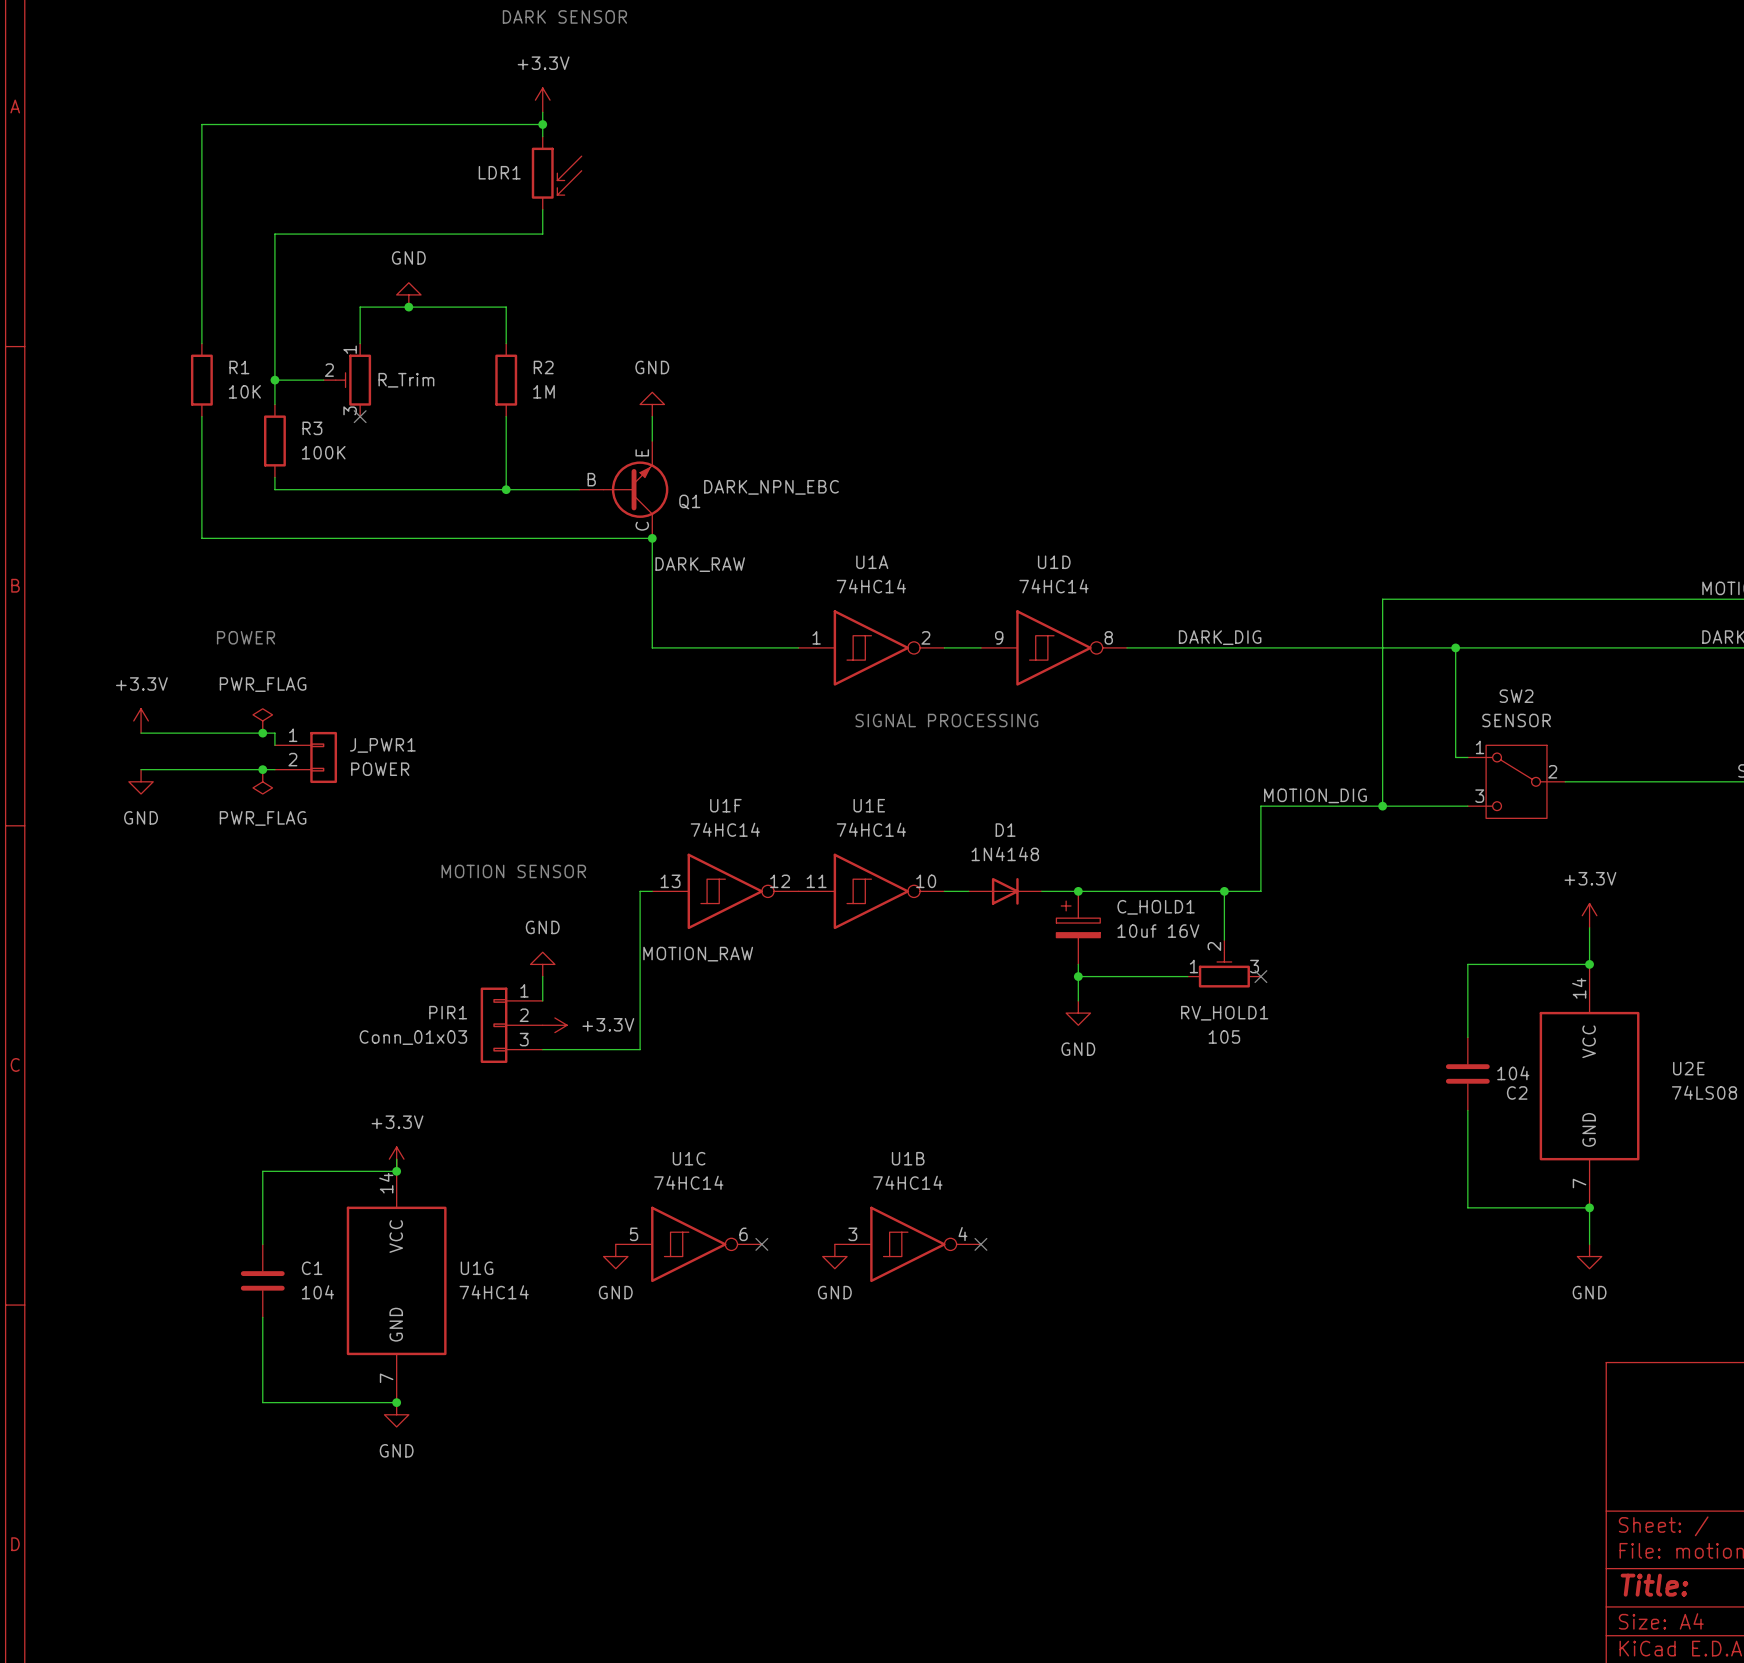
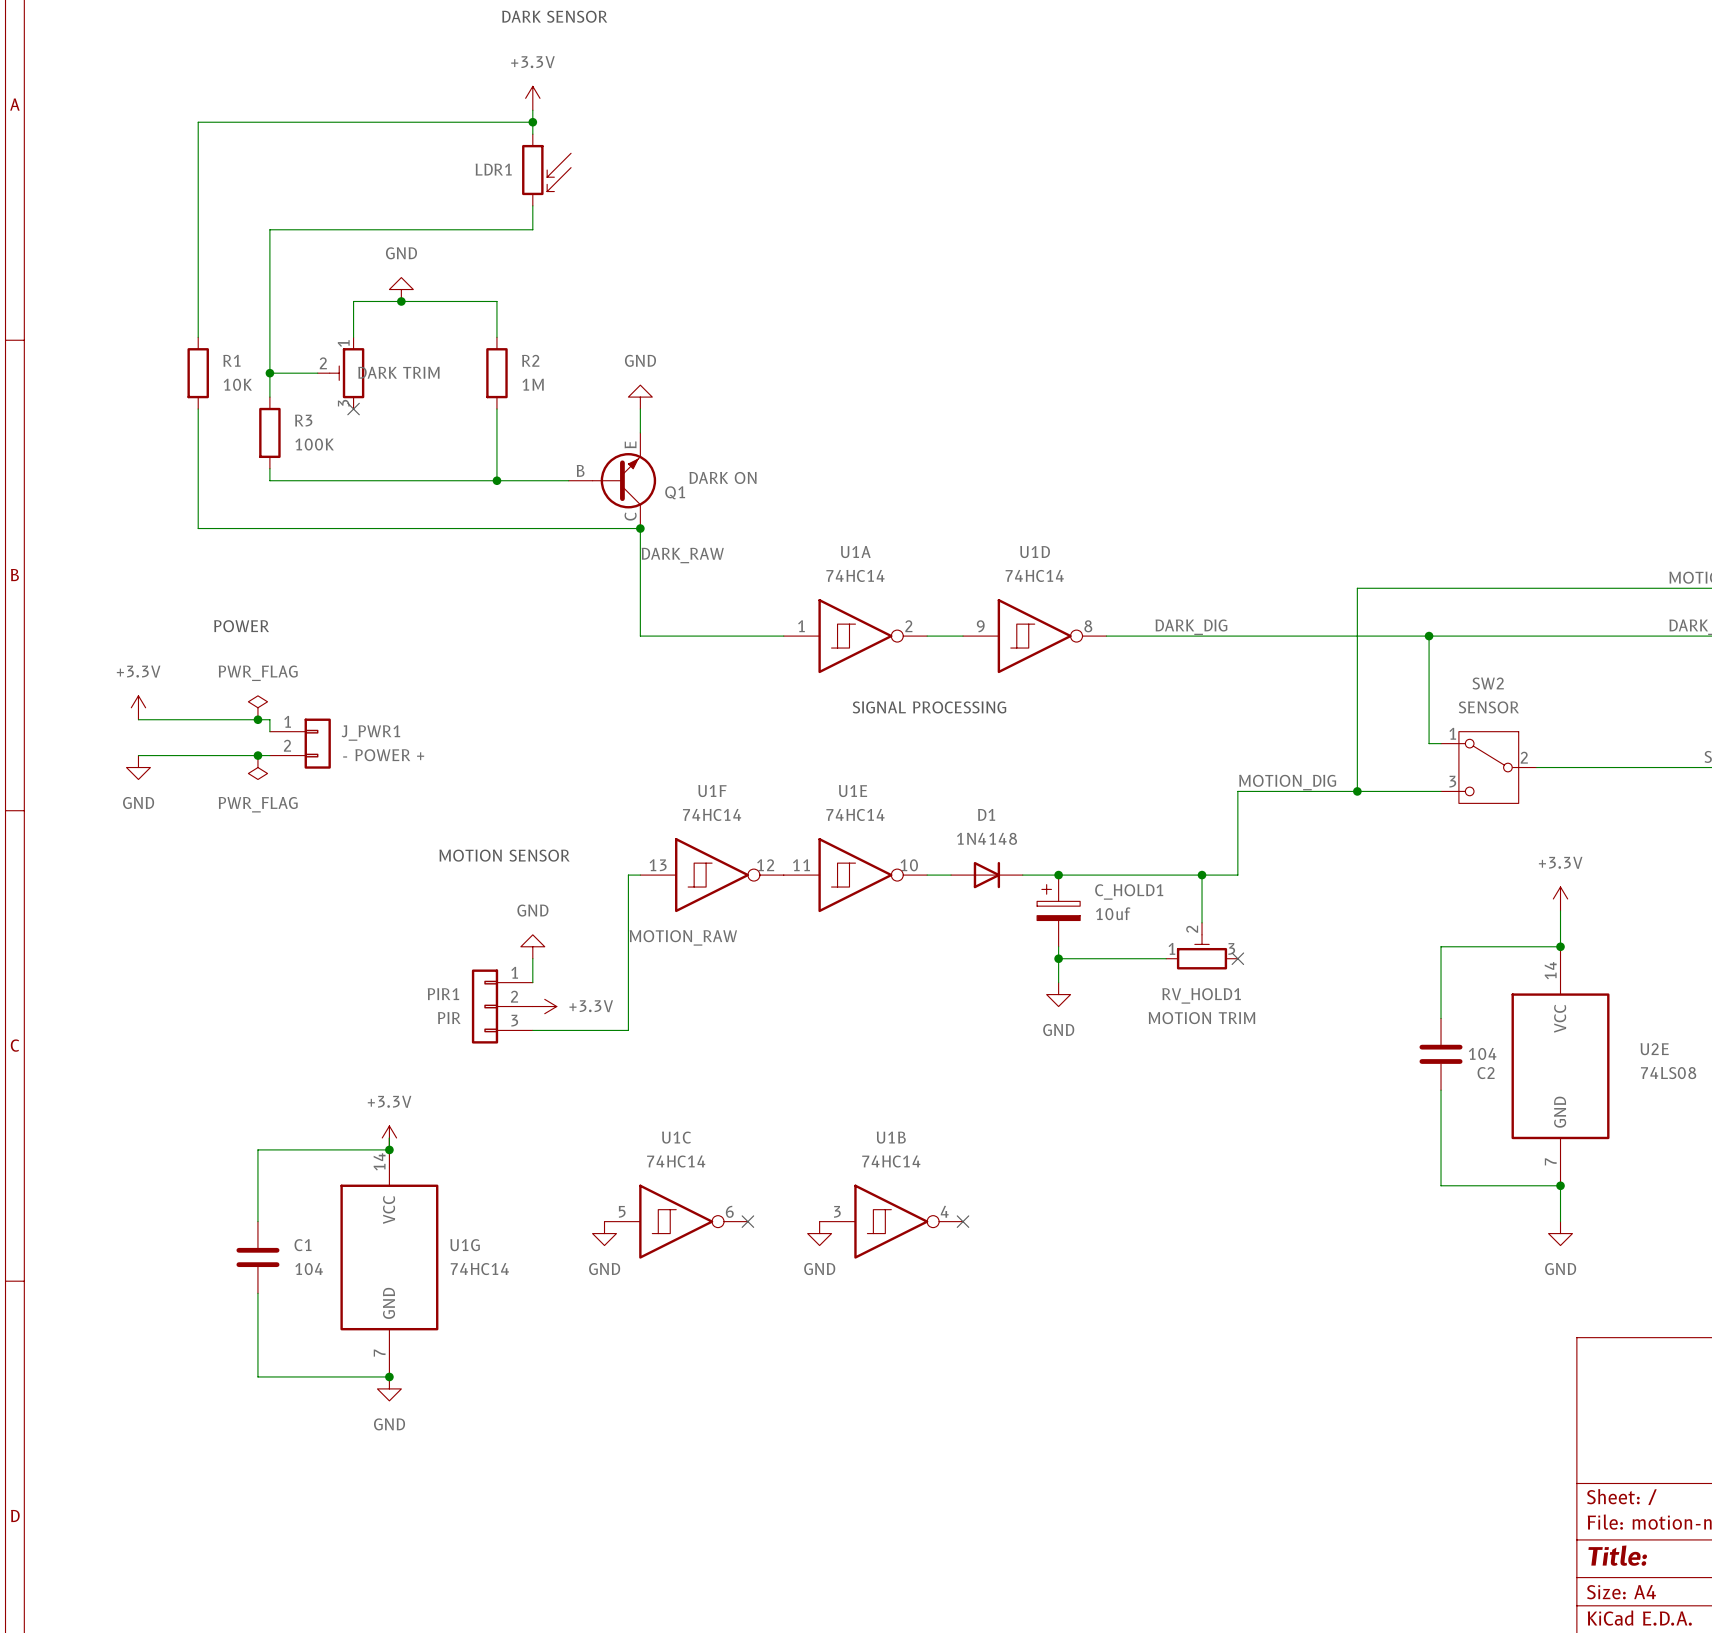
part value: R_Trim (406, 380) -> DARK TRIM (398, 372)
Q1 value: DARK_NPN_EBC (771, 487) -> DARK ON (723, 477)
J_PWR1 value: POWER (380, 769) -> - POWER + (383, 755)
C_HOLD1 value: 10uf 16V (1158, 931) -> 10uf (1113, 913)
RV_HOLD1 value: 105 (1224, 1036) -> MOTION TRIM (1201, 1018)
PIR1 value: Conn_01x03 (413, 1037) -> PIR (449, 1018)

